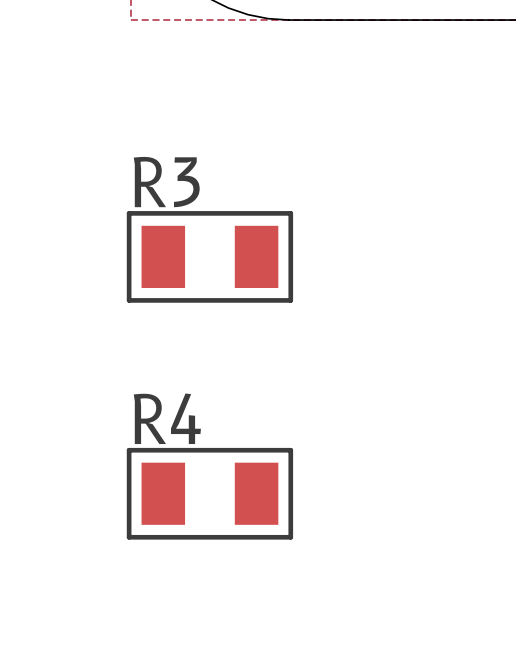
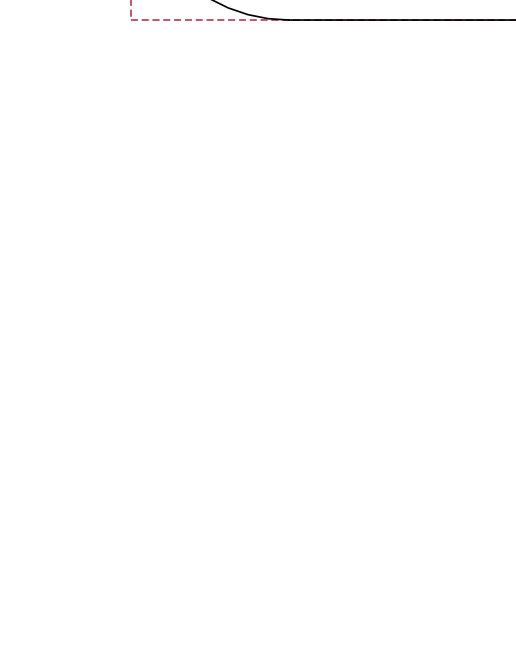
R3: (209, 256) -> none
R4: (209, 493) -> none

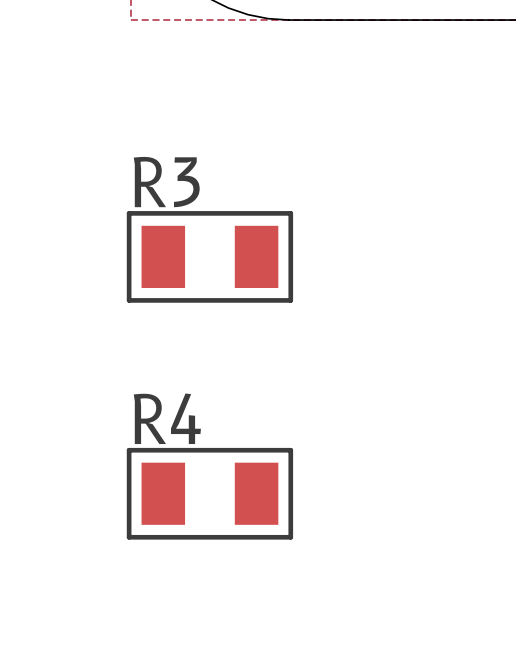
R3: none -> (209, 256)
R4: none -> (209, 493)

